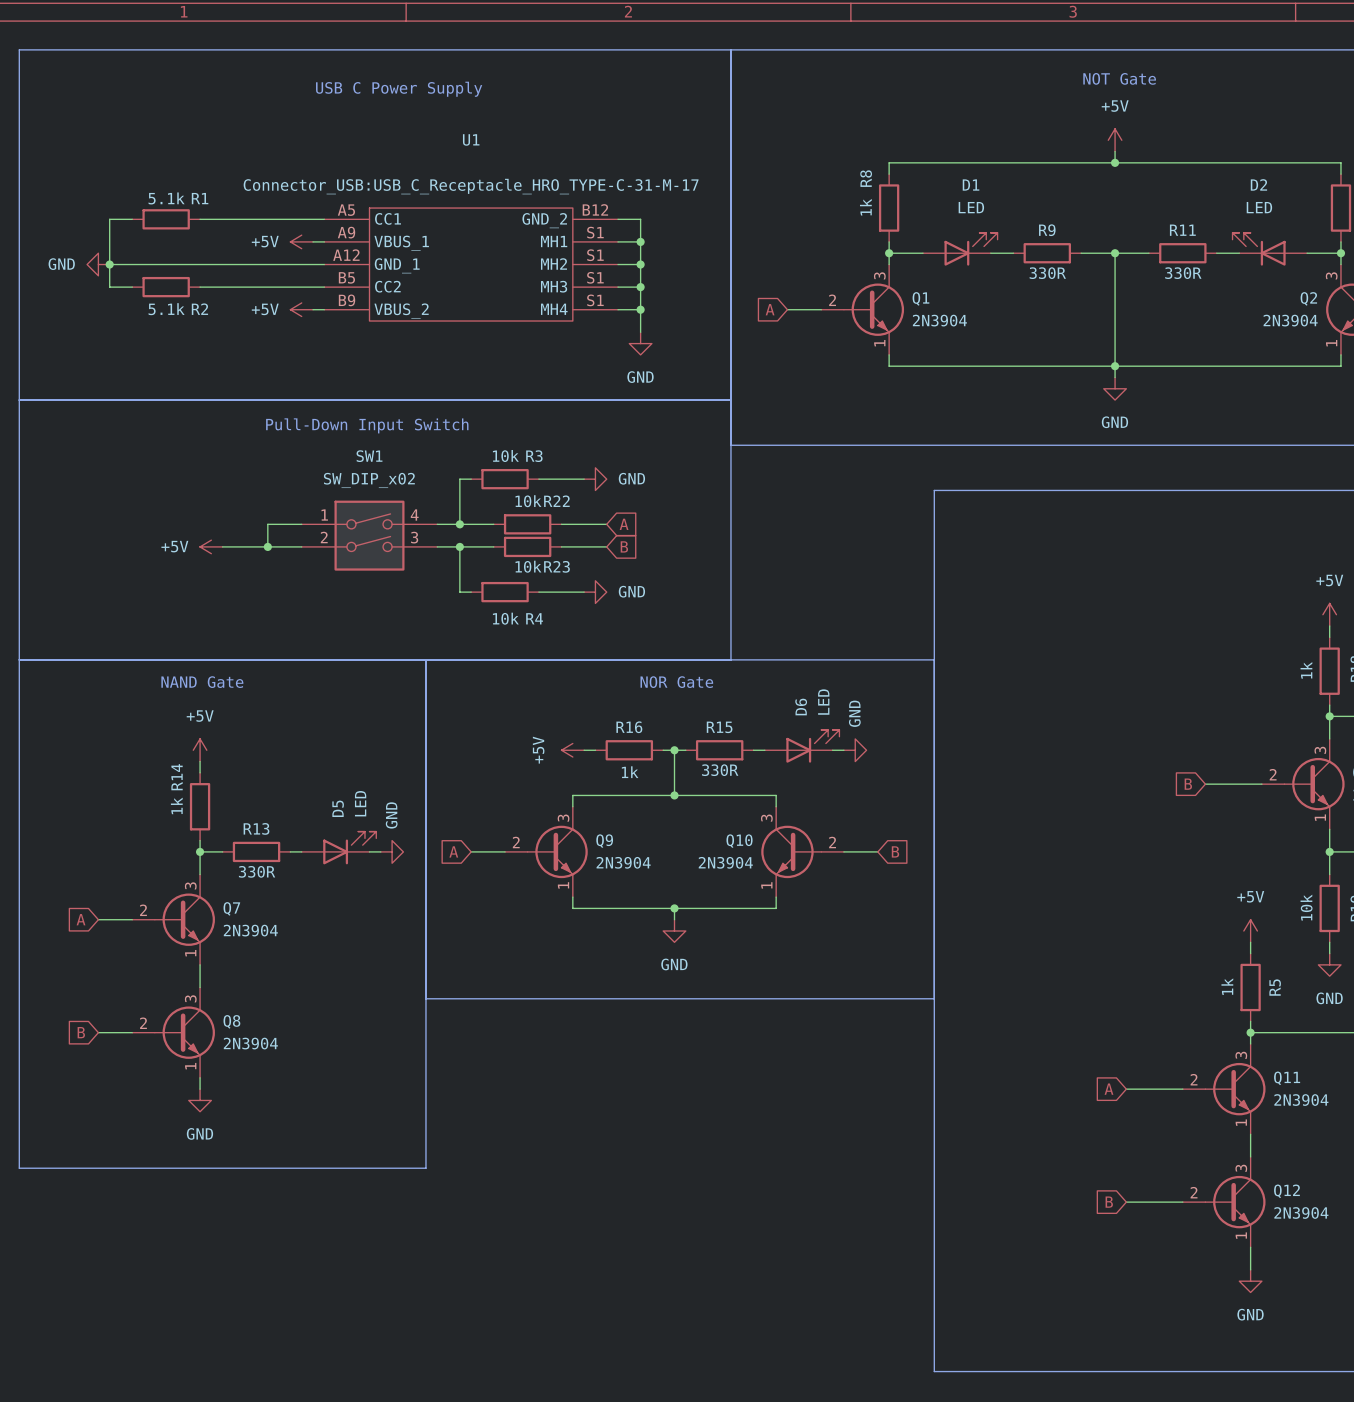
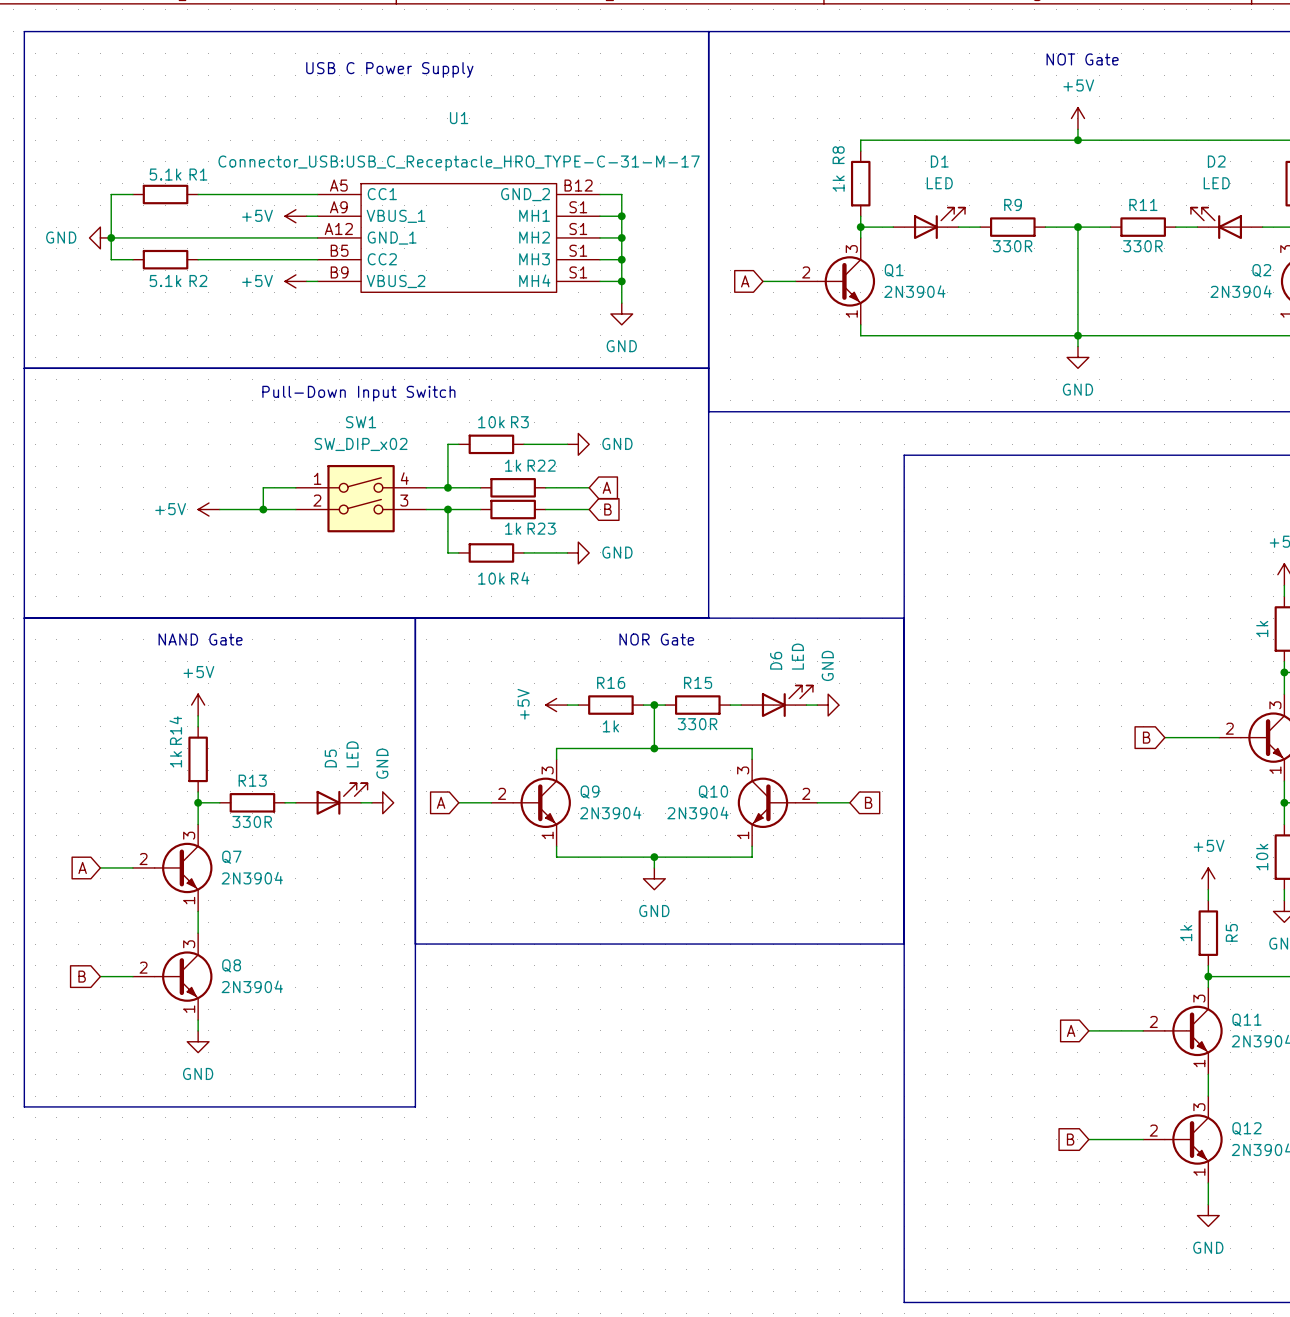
R22 value: 10k (528, 501) -> 1k (513, 465)
R23 value: 10k (528, 566) -> 1k (513, 528)

